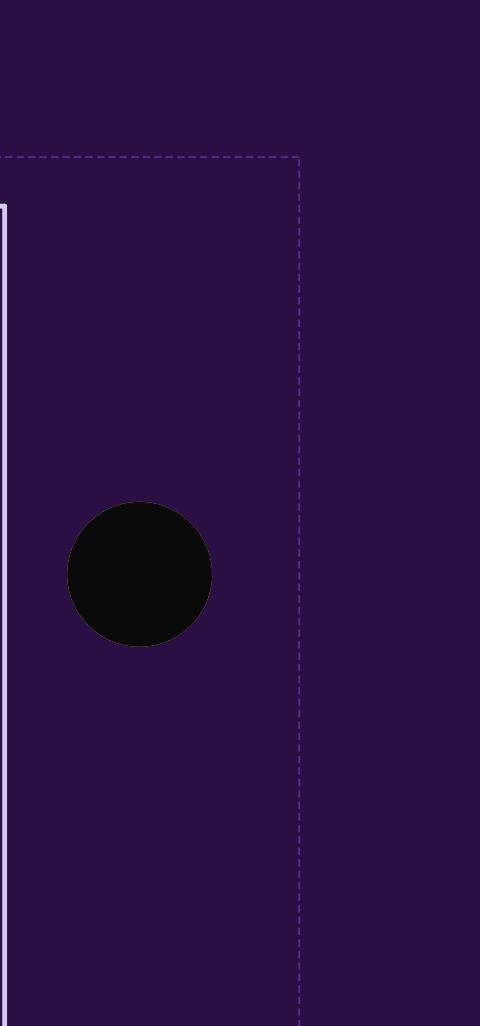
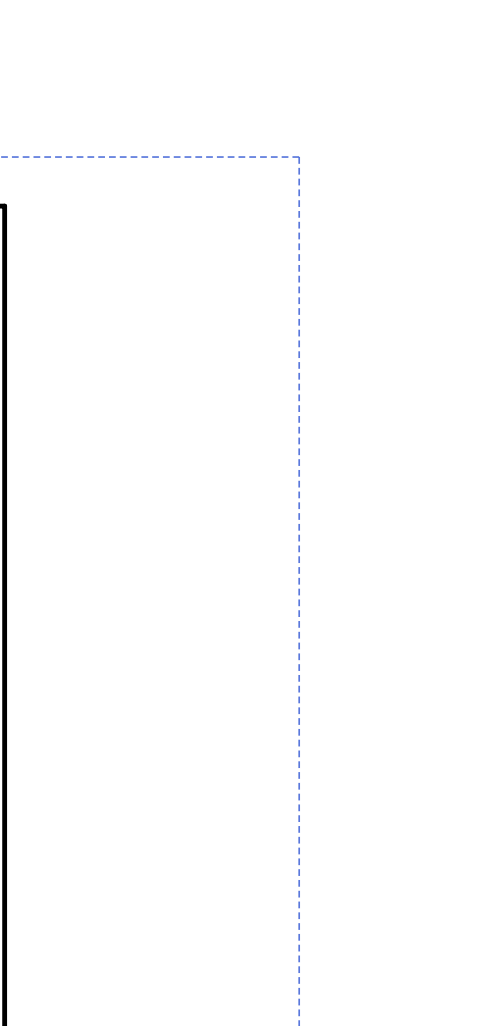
part: (139, 574) -> none

